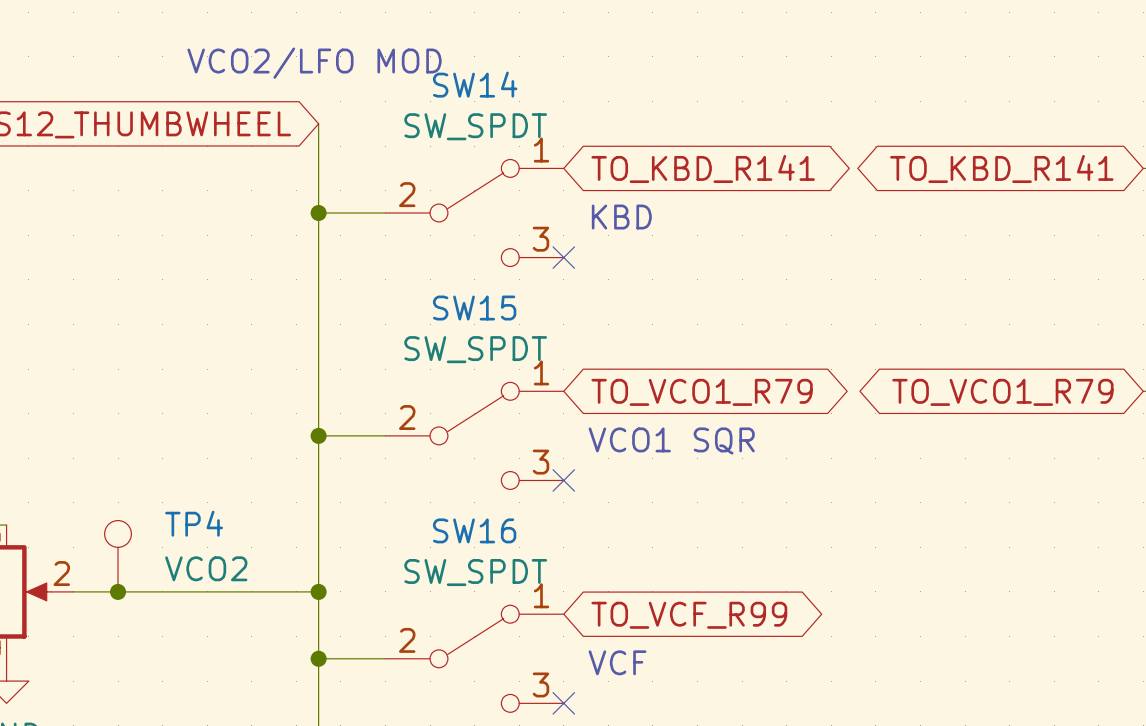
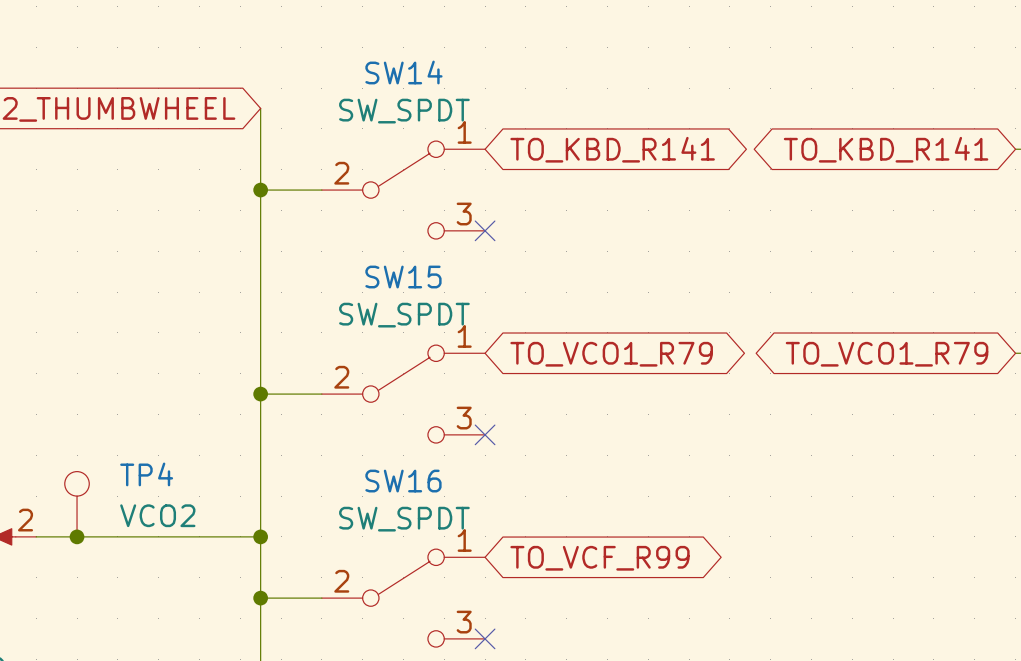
text: VCO2/LFO MOD (314, 63) -> none
text: KBD (621, 217) -> none
text: VCO1 SQR (671, 440) -> none
text: VCF (617, 662) -> none

